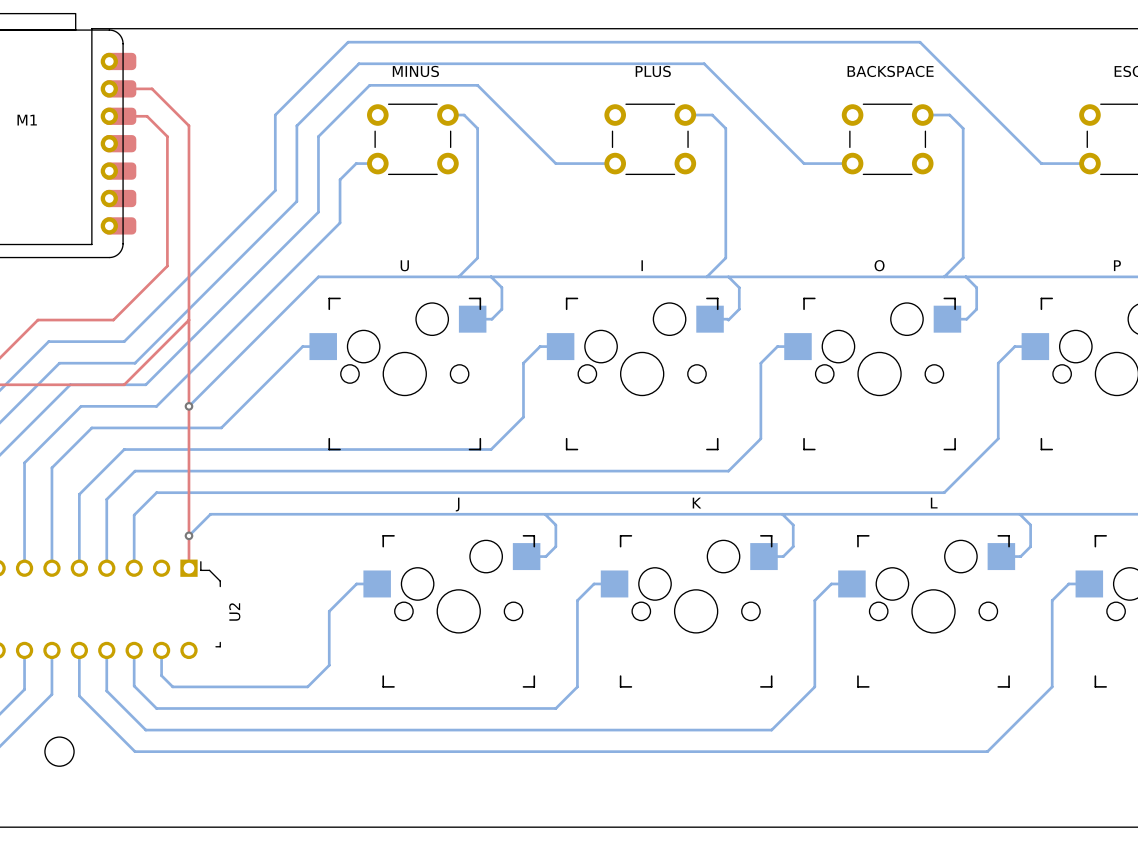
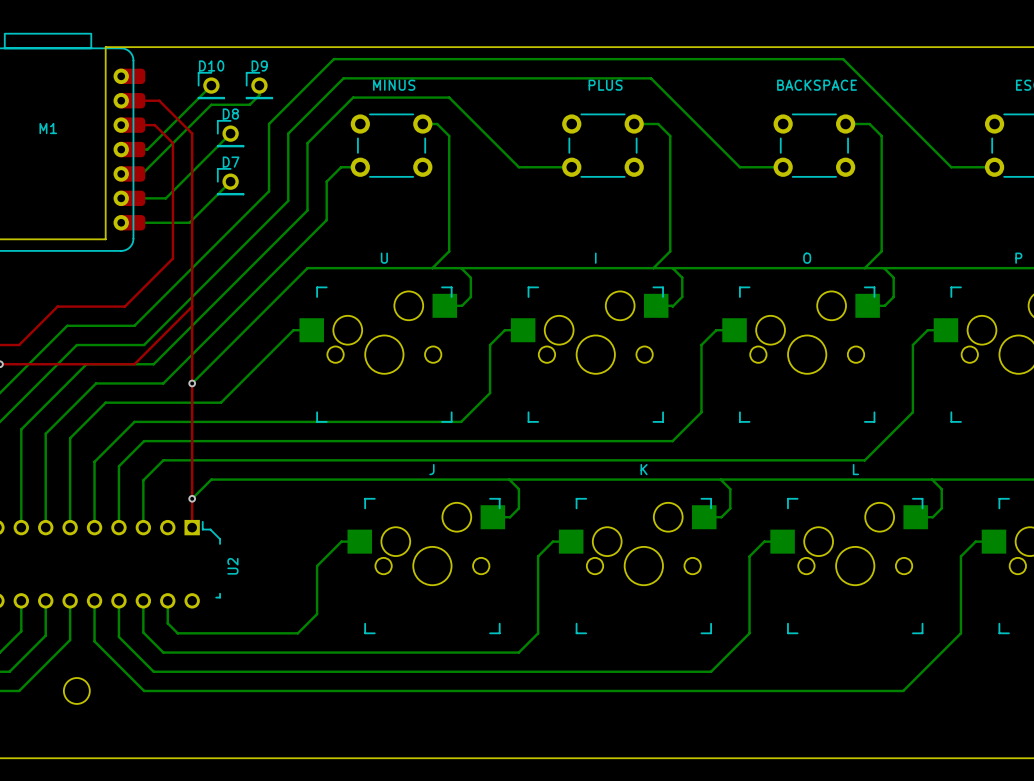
text: none -> D10 (211, 65)
text: none -> D9 (259, 65)
bottom track: none -> (211, 85) (147, 149) (121, 149)
part: none -> (211, 85)
bottom track: none -> (259, 85) (259, 95) (249, 104) (211, 104) (142, 173) (121, 173)
part: none -> (259, 85)
text: none -> D8 (230, 114)
bottom track: none -> (230, 133) (165, 198) (121, 198)
part: none -> (230, 133)
text: none -> D7 (231, 162)
bottom track: none -> (230, 181) (189, 222) (121, 222)
part: none -> (230, 181)

